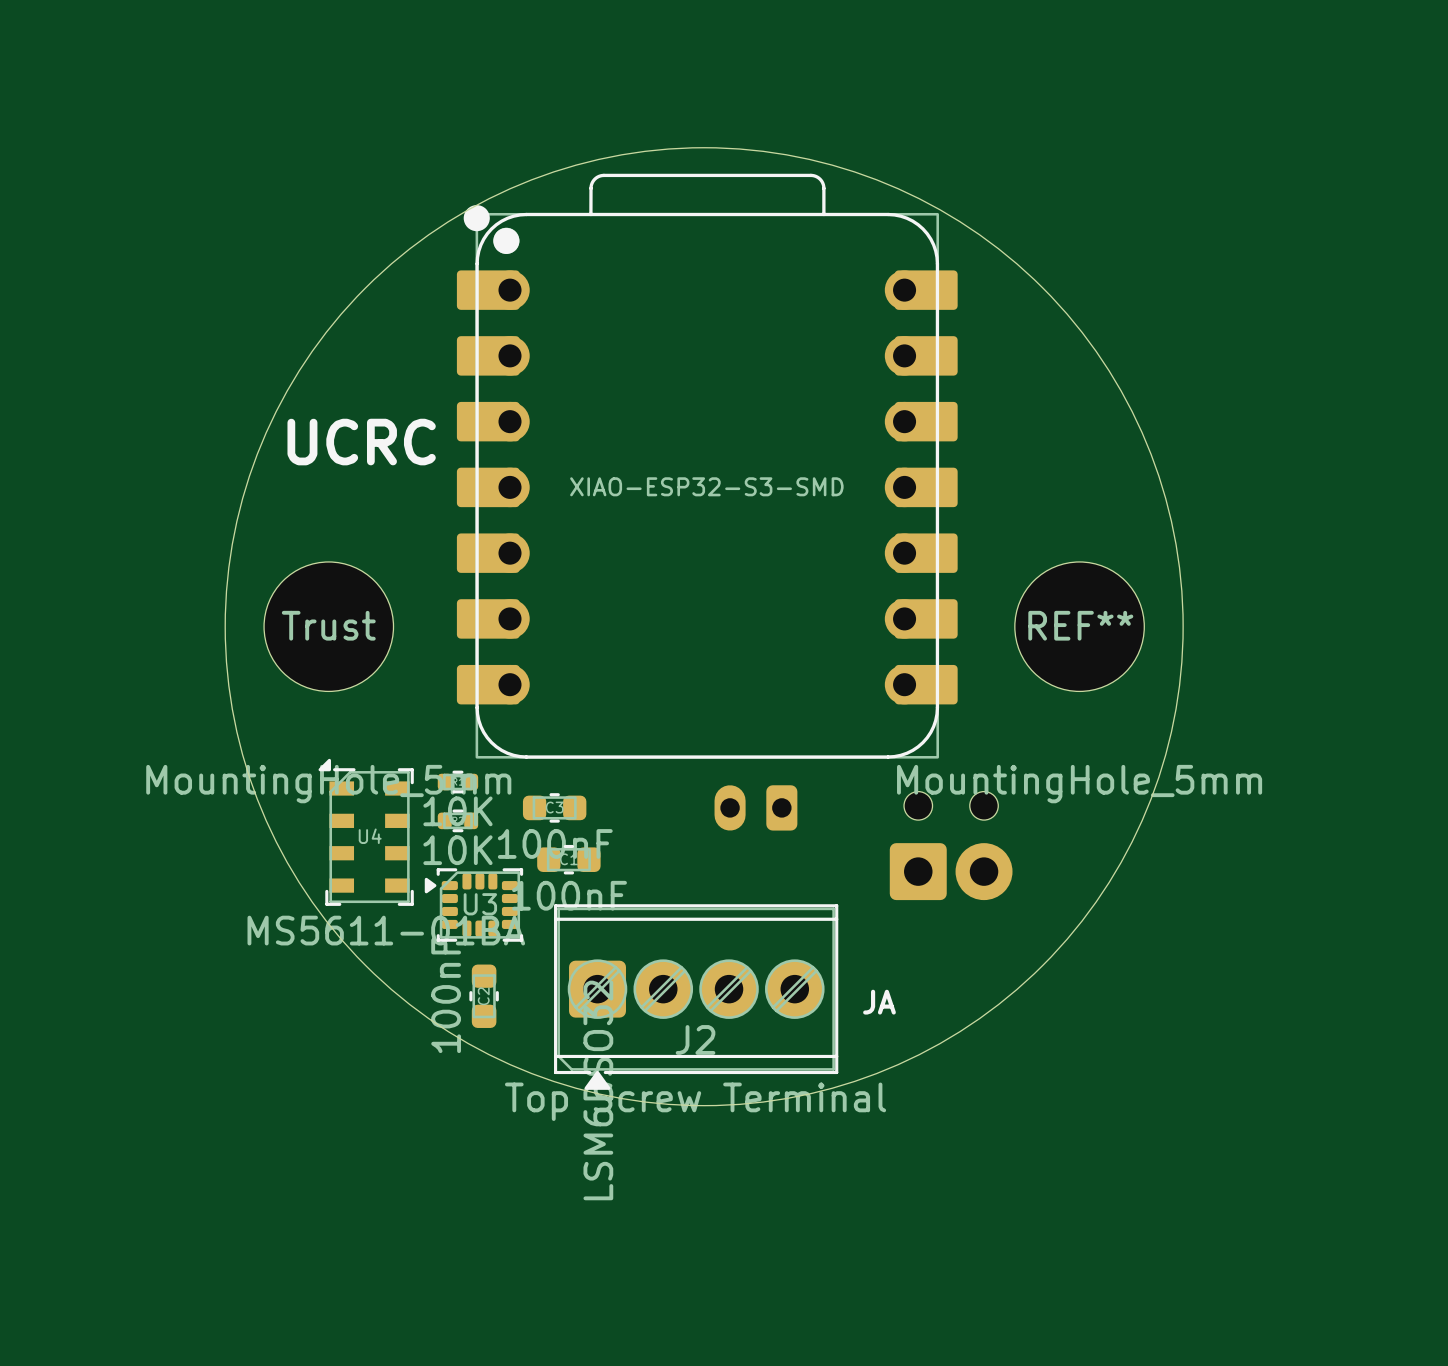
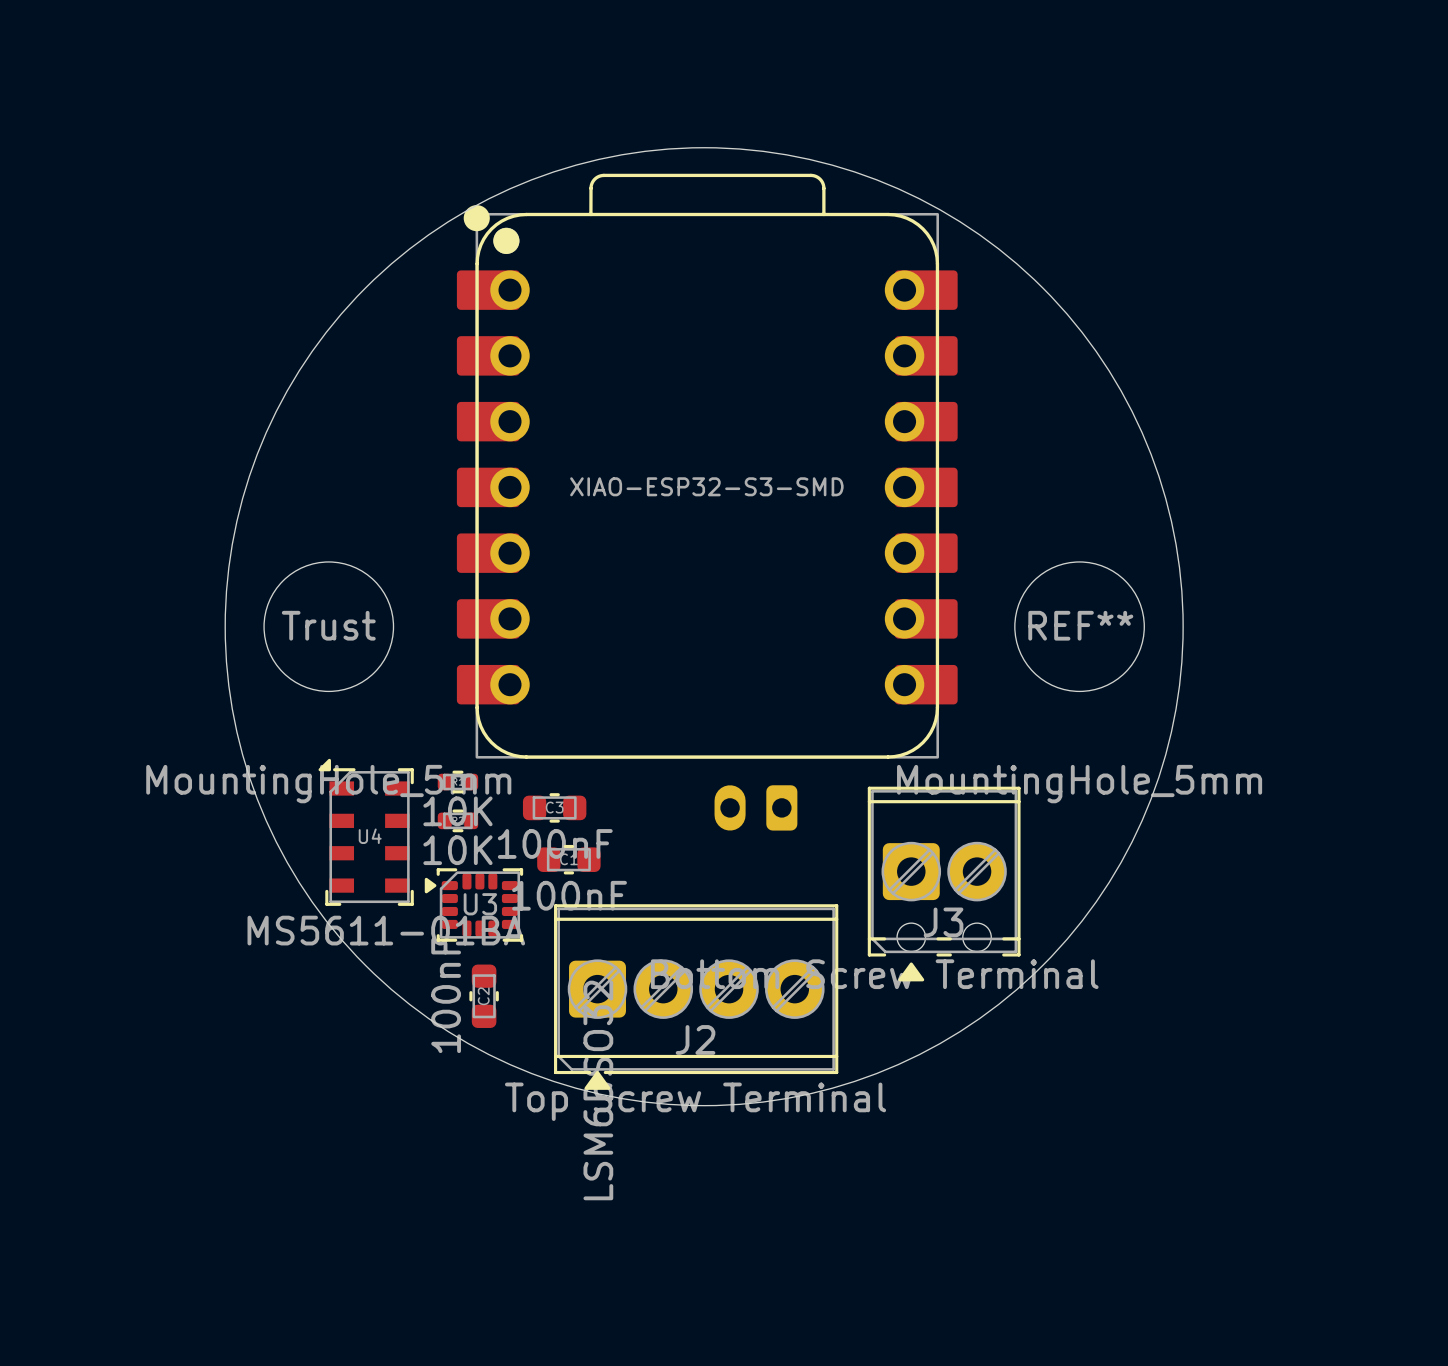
text: UCRC (361, 442) -> none
J3 side: bottom (951, 845) -> top (944, 884)
text: JA (879, 1002) -> none

